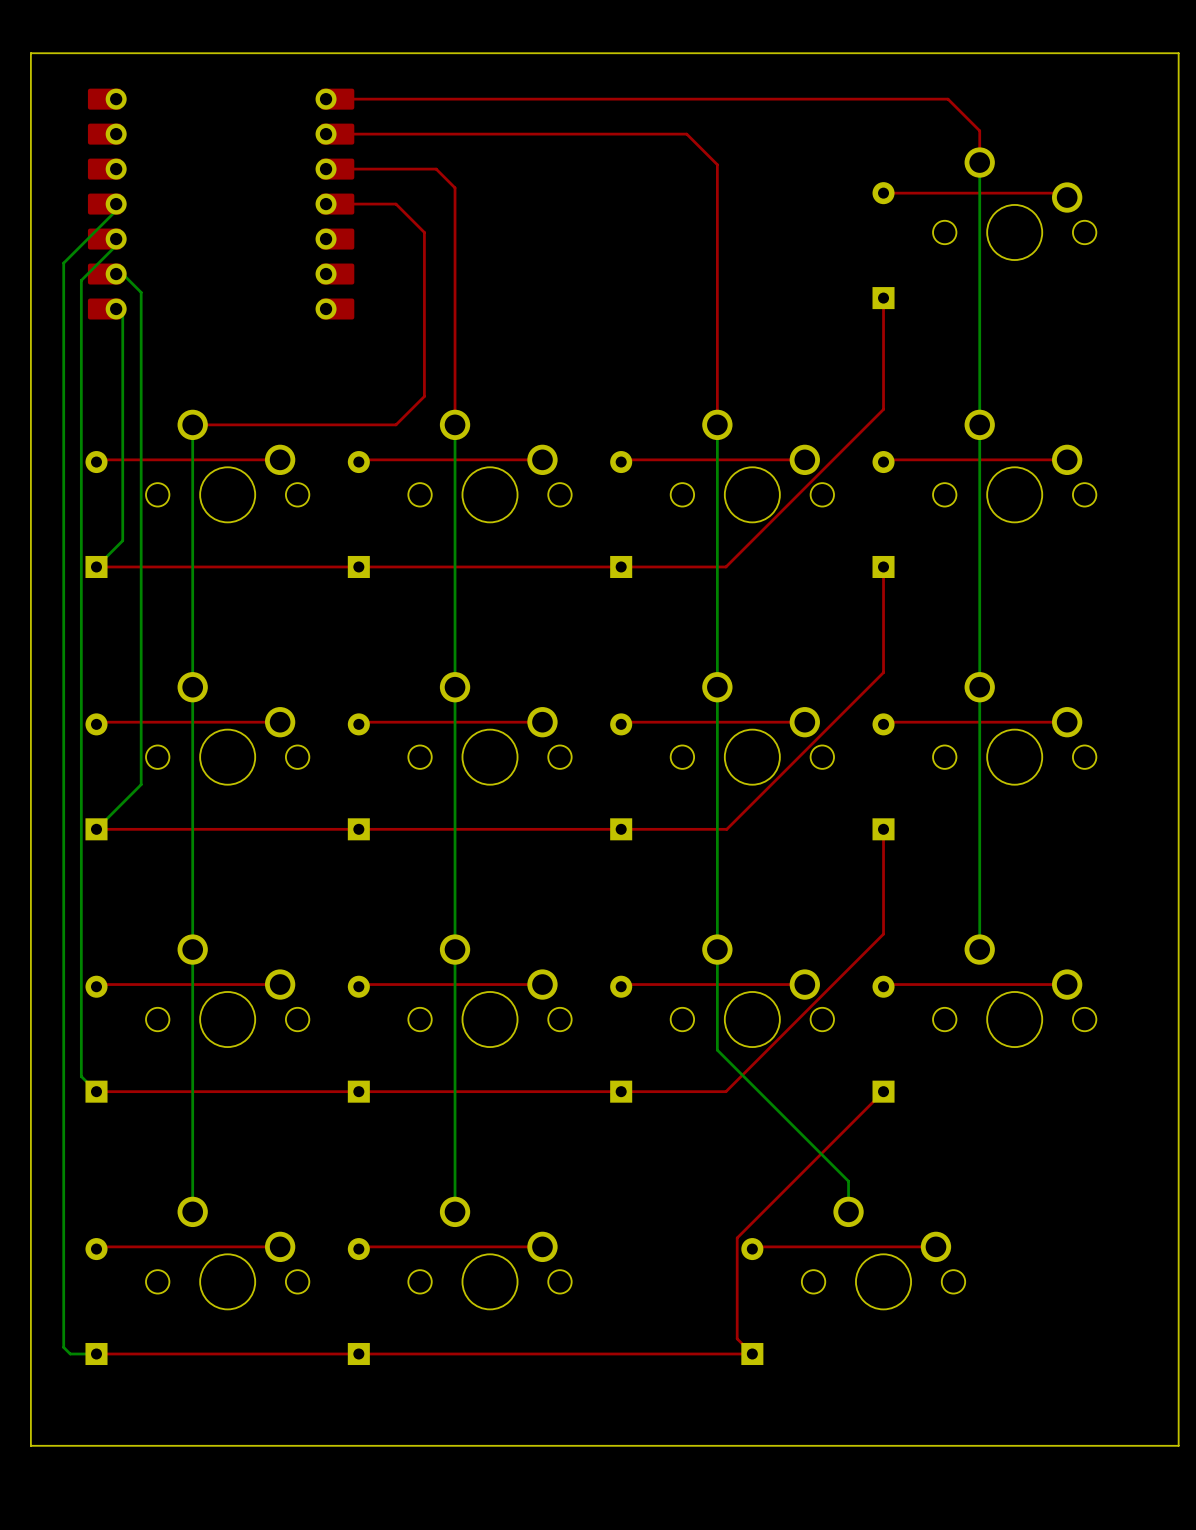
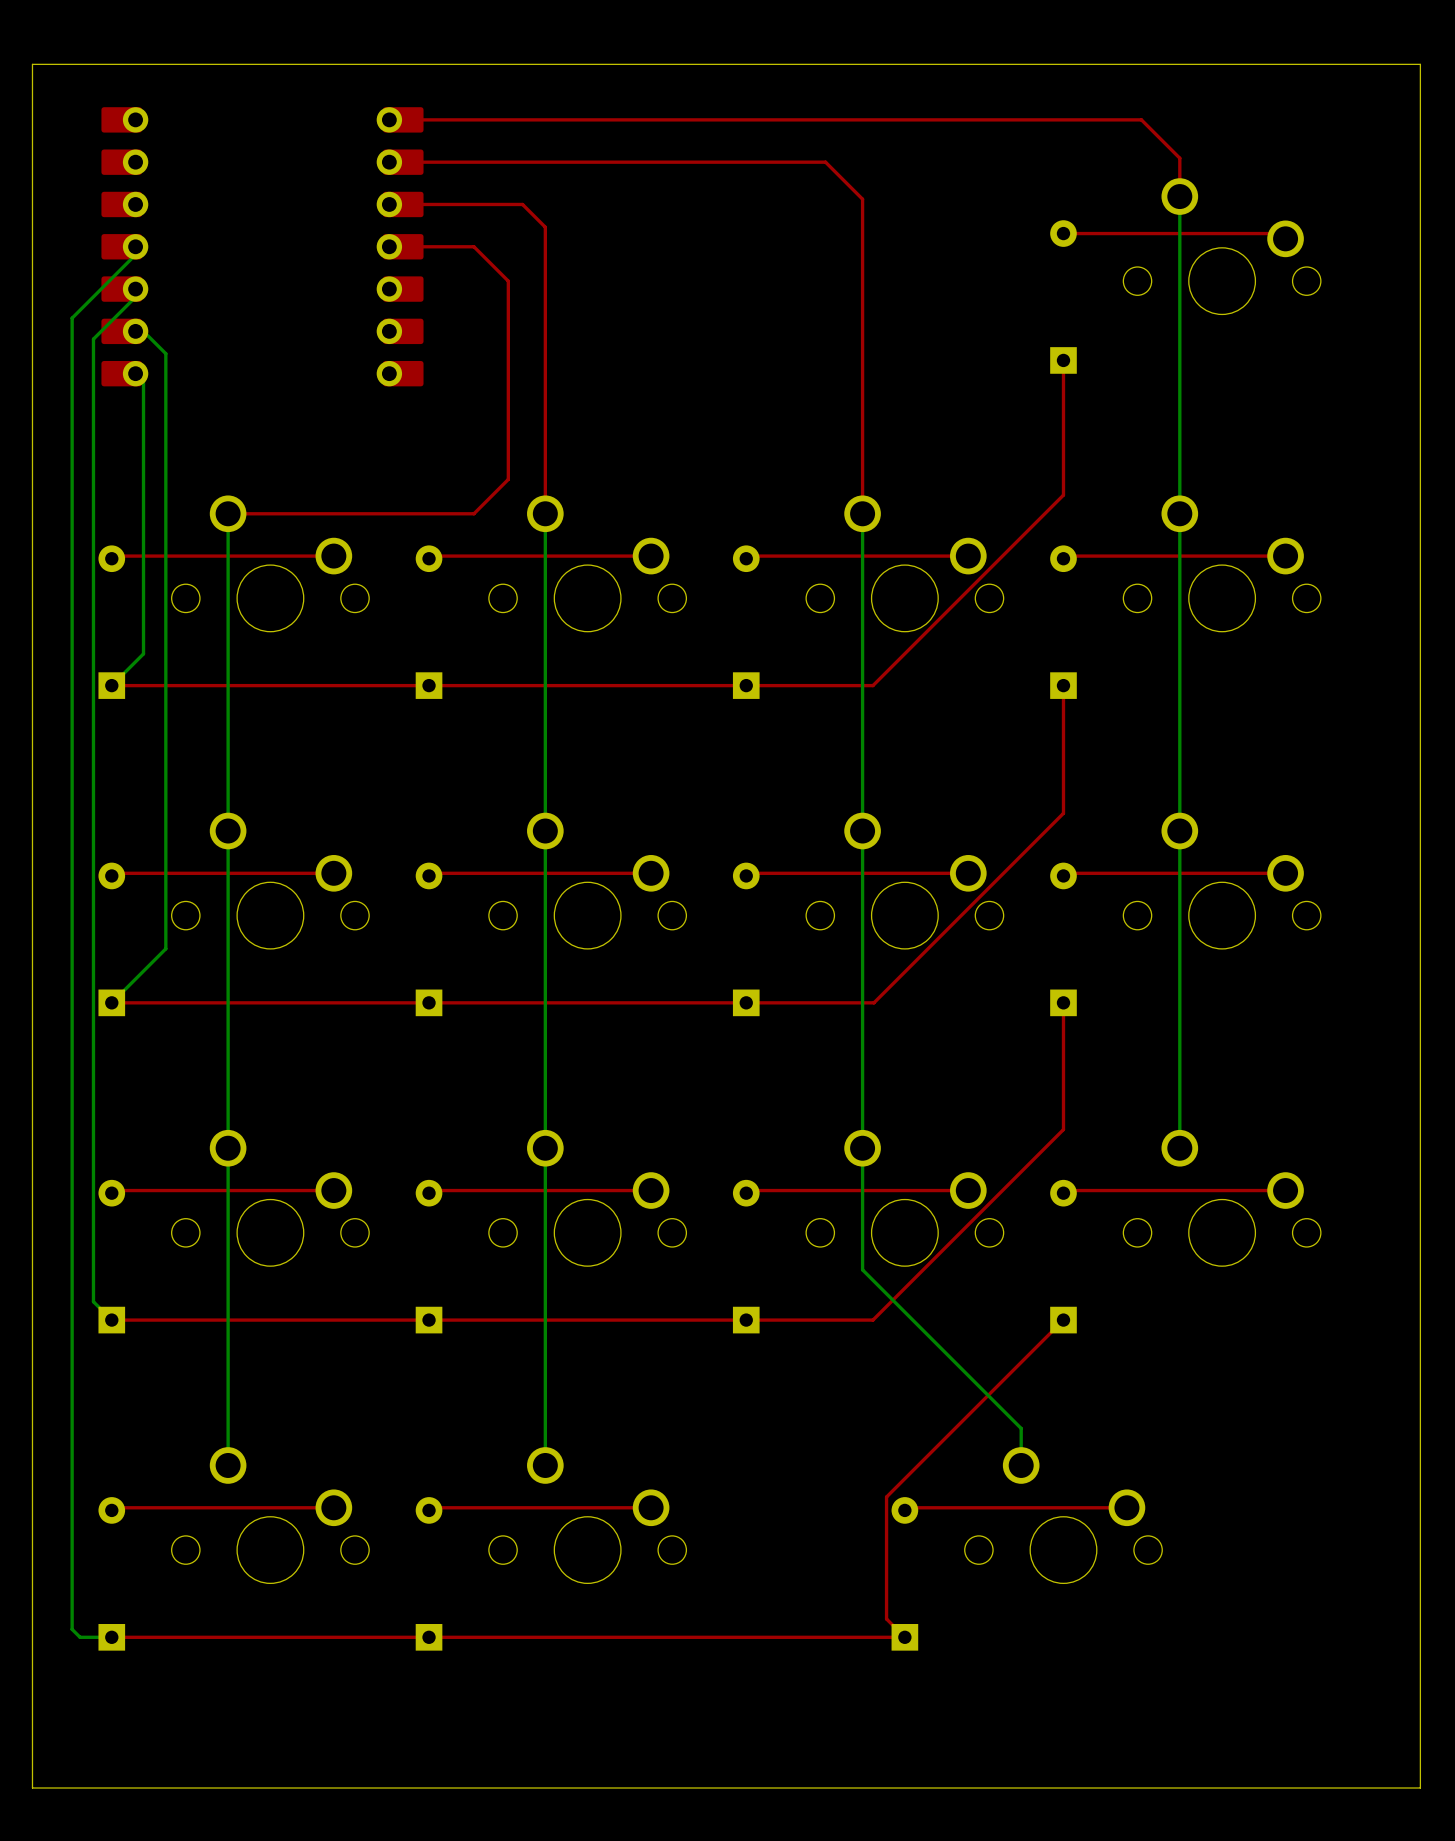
board edge: (1178, 1445) (30, 1445) -> (1420, 1748) (1420, 1788) (32, 1788) (32, 1748)

